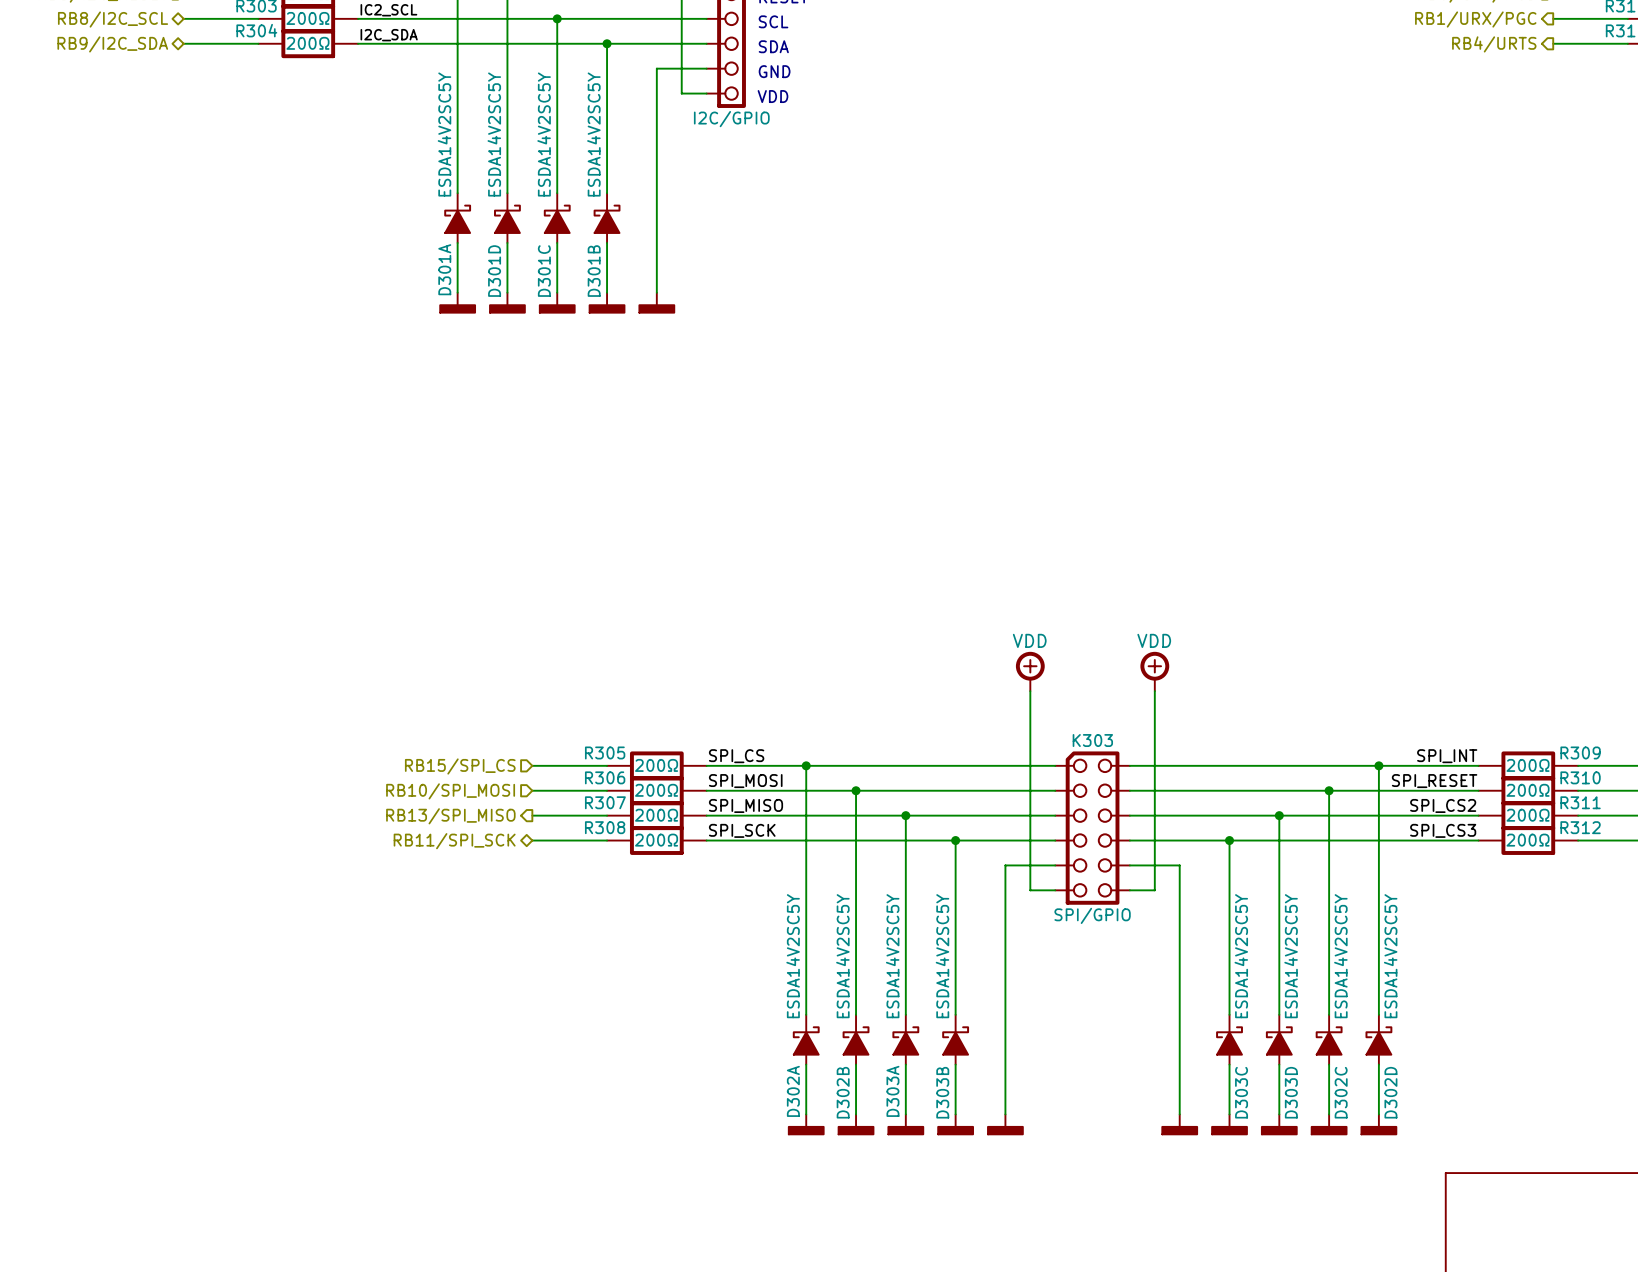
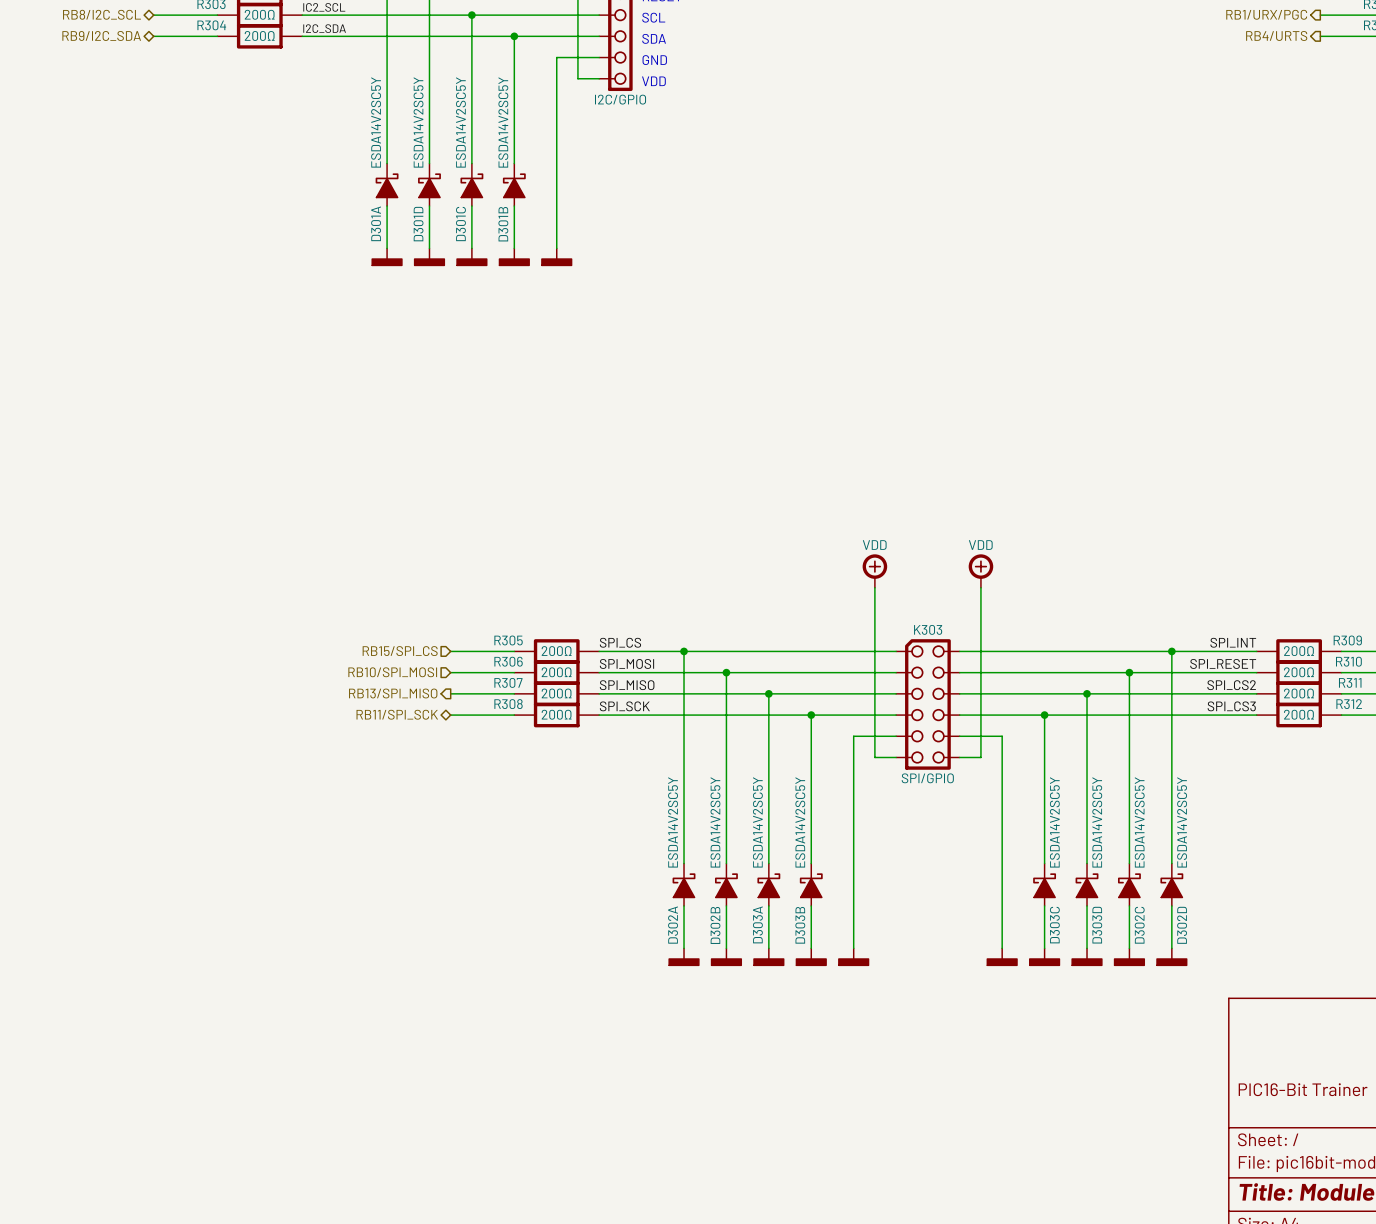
power symbol text: VDD (1029, 640) -> none
power symbol text: none -> VDD (874, 545)
power symbol text: VDD (1154, 640) -> none
power symbol text: none -> VDD (980, 545)

